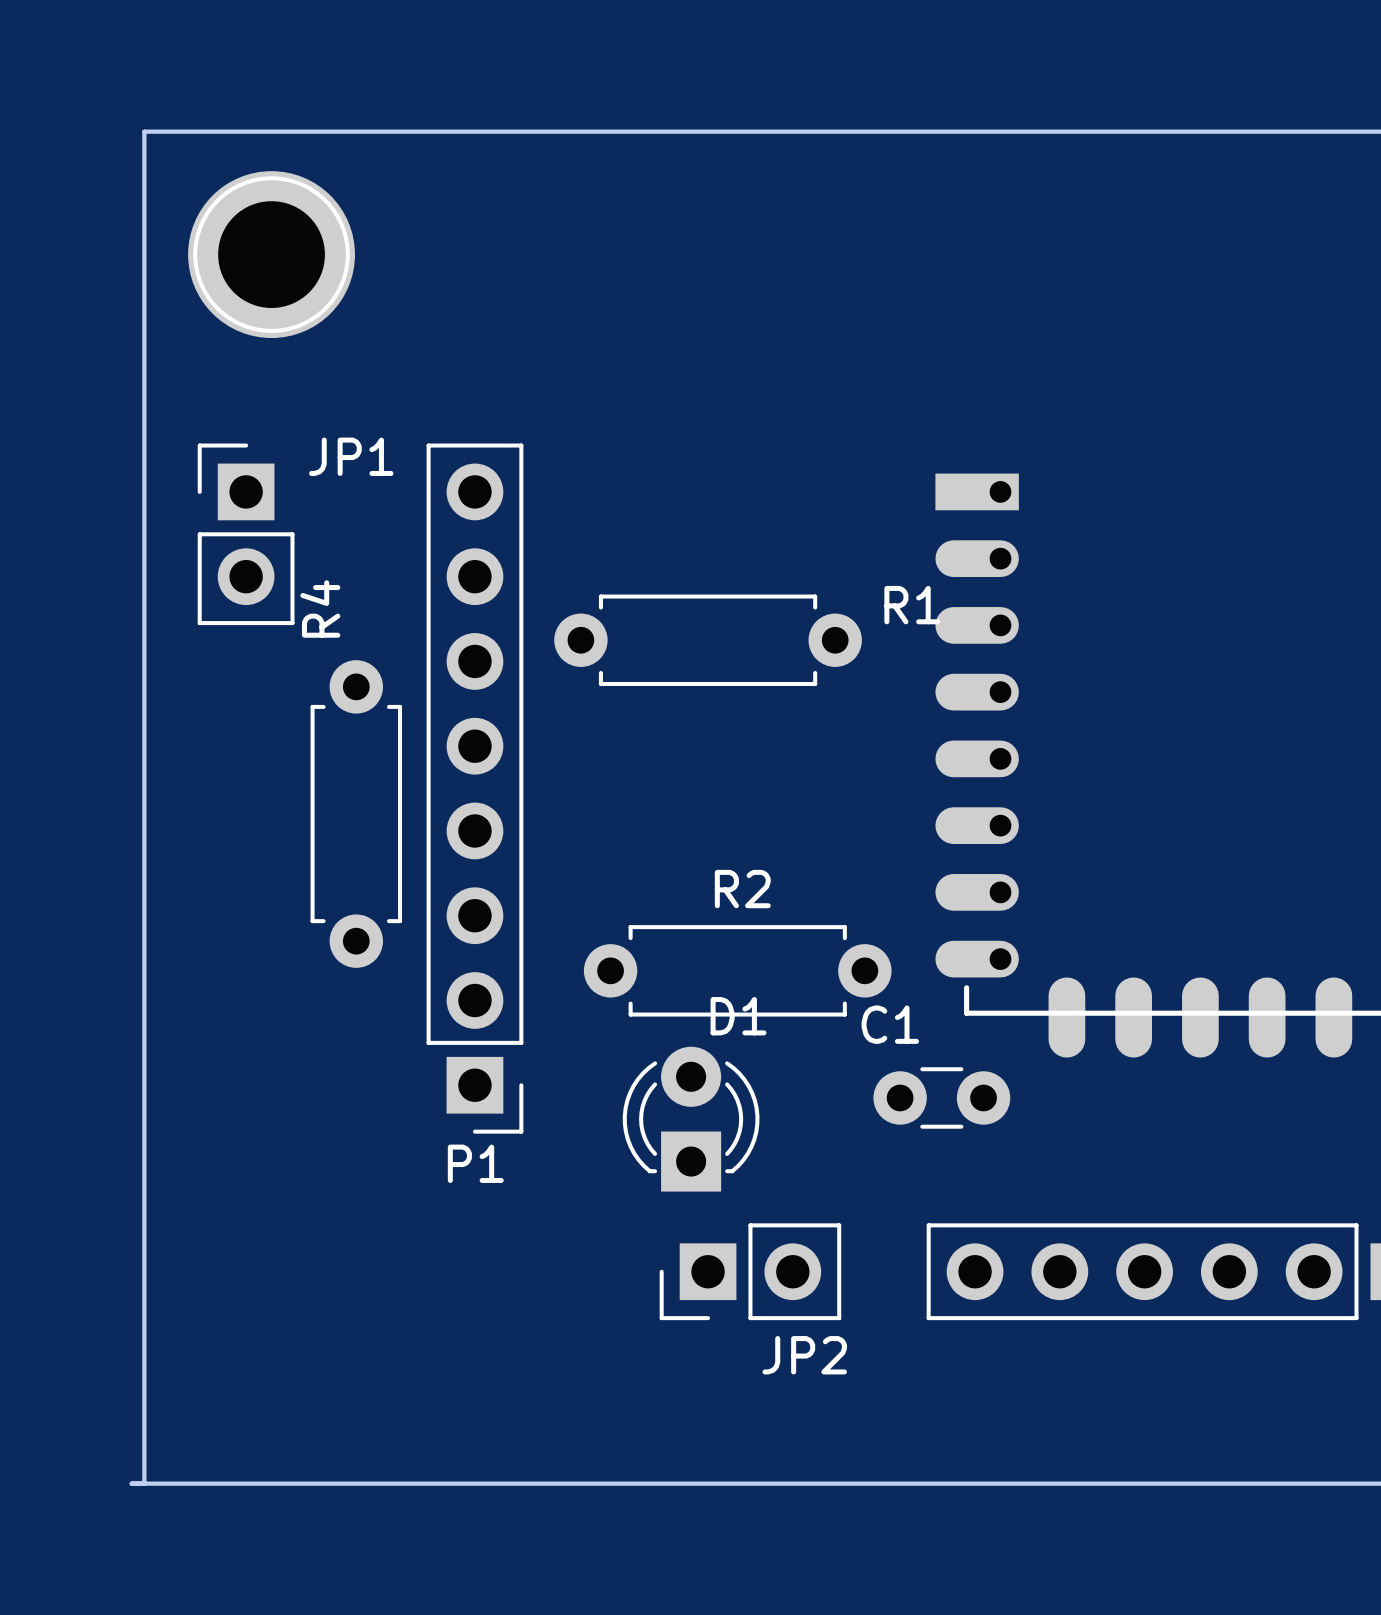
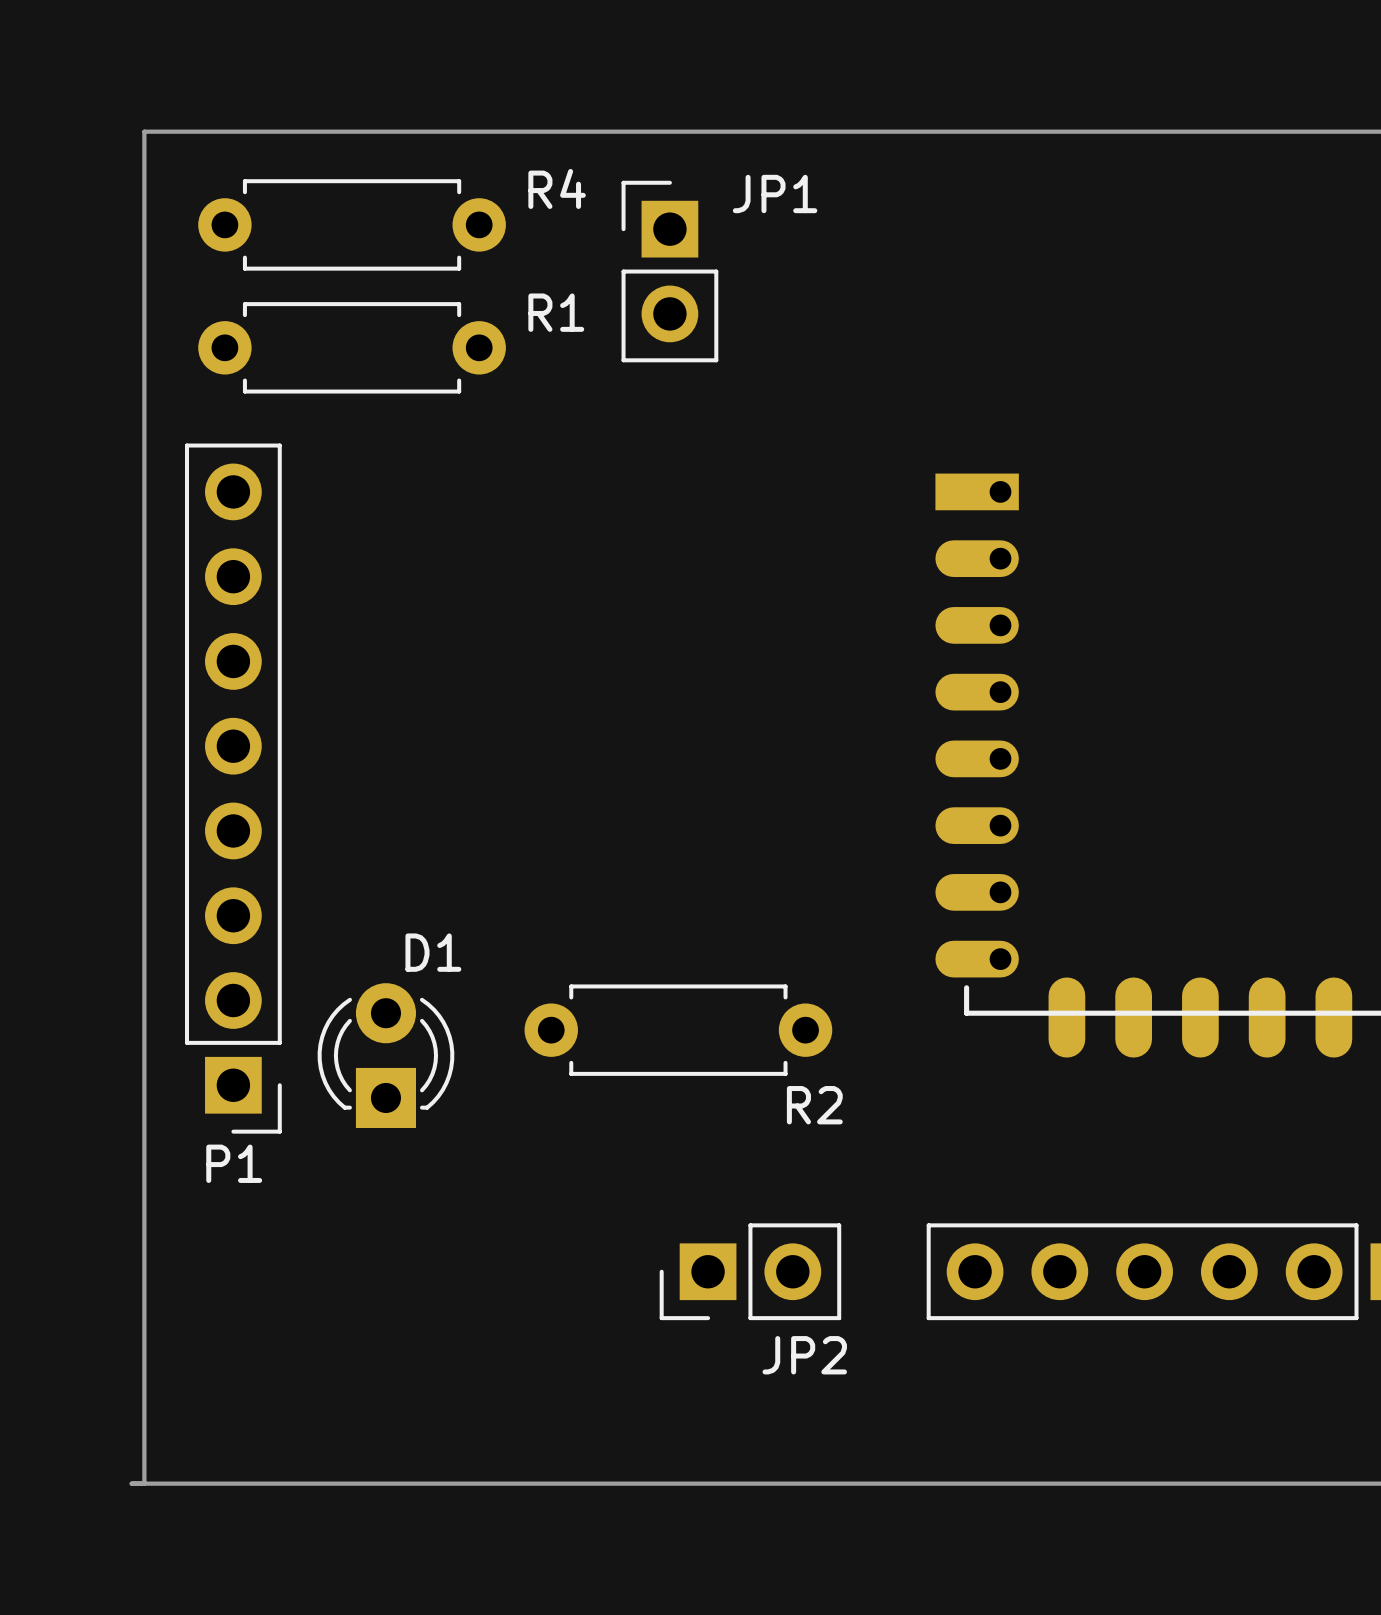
part: (271, 254) -> none
JP1 position: (246, 534) -> (669, 271)
R1 position: (708, 640) -> (352, 347)
P1 position: (474, 788) -> (233, 788)
R4 rotation: 0° (356, 814) -> 90° clockwise (352, 224)
R4 position: (356, 814) -> (352, 224)
R2 name position: R2 (742, 889) -> R2 (814, 1105)
R2 position: (737, 970) -> (678, 1030)
C1: (941, 1097) -> none
D1 position: (691, 1119) -> (385, 1055)

